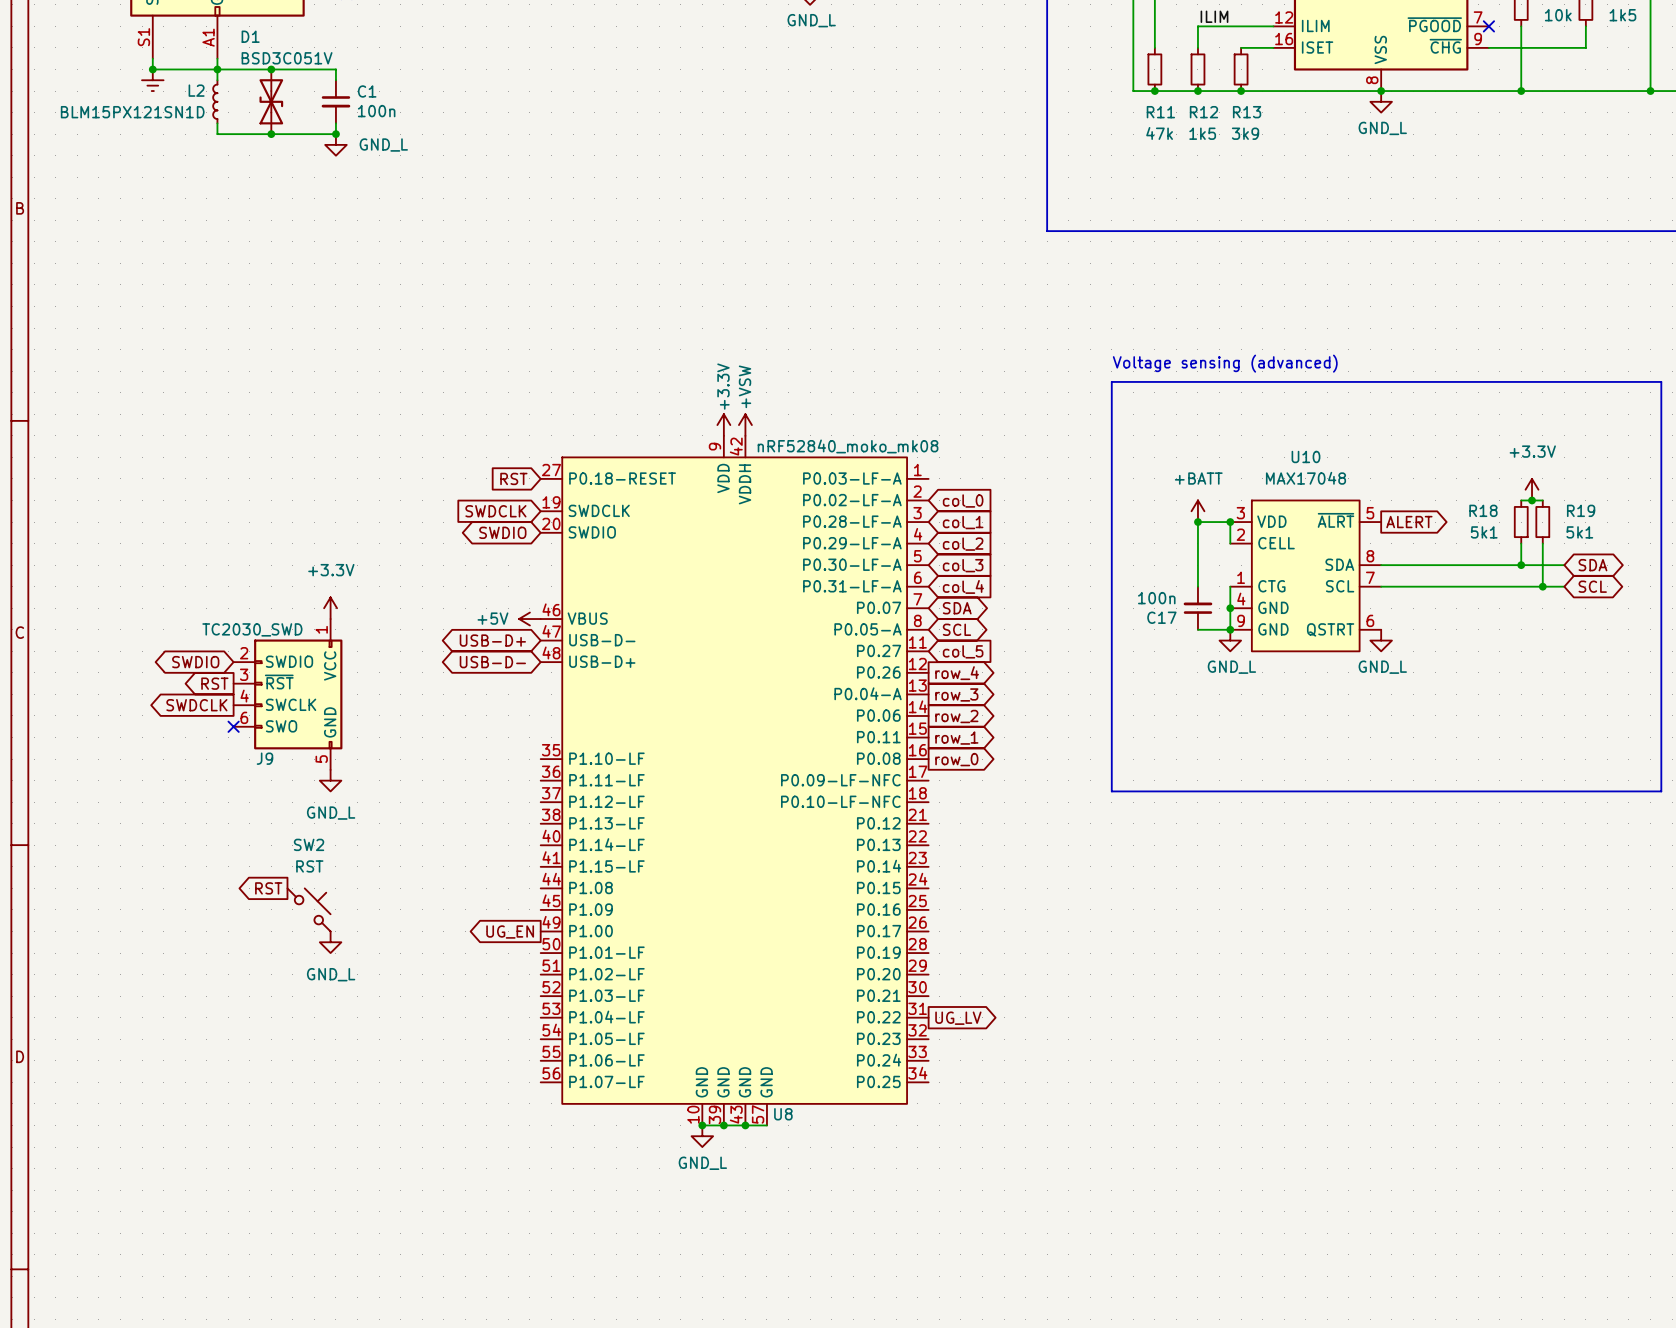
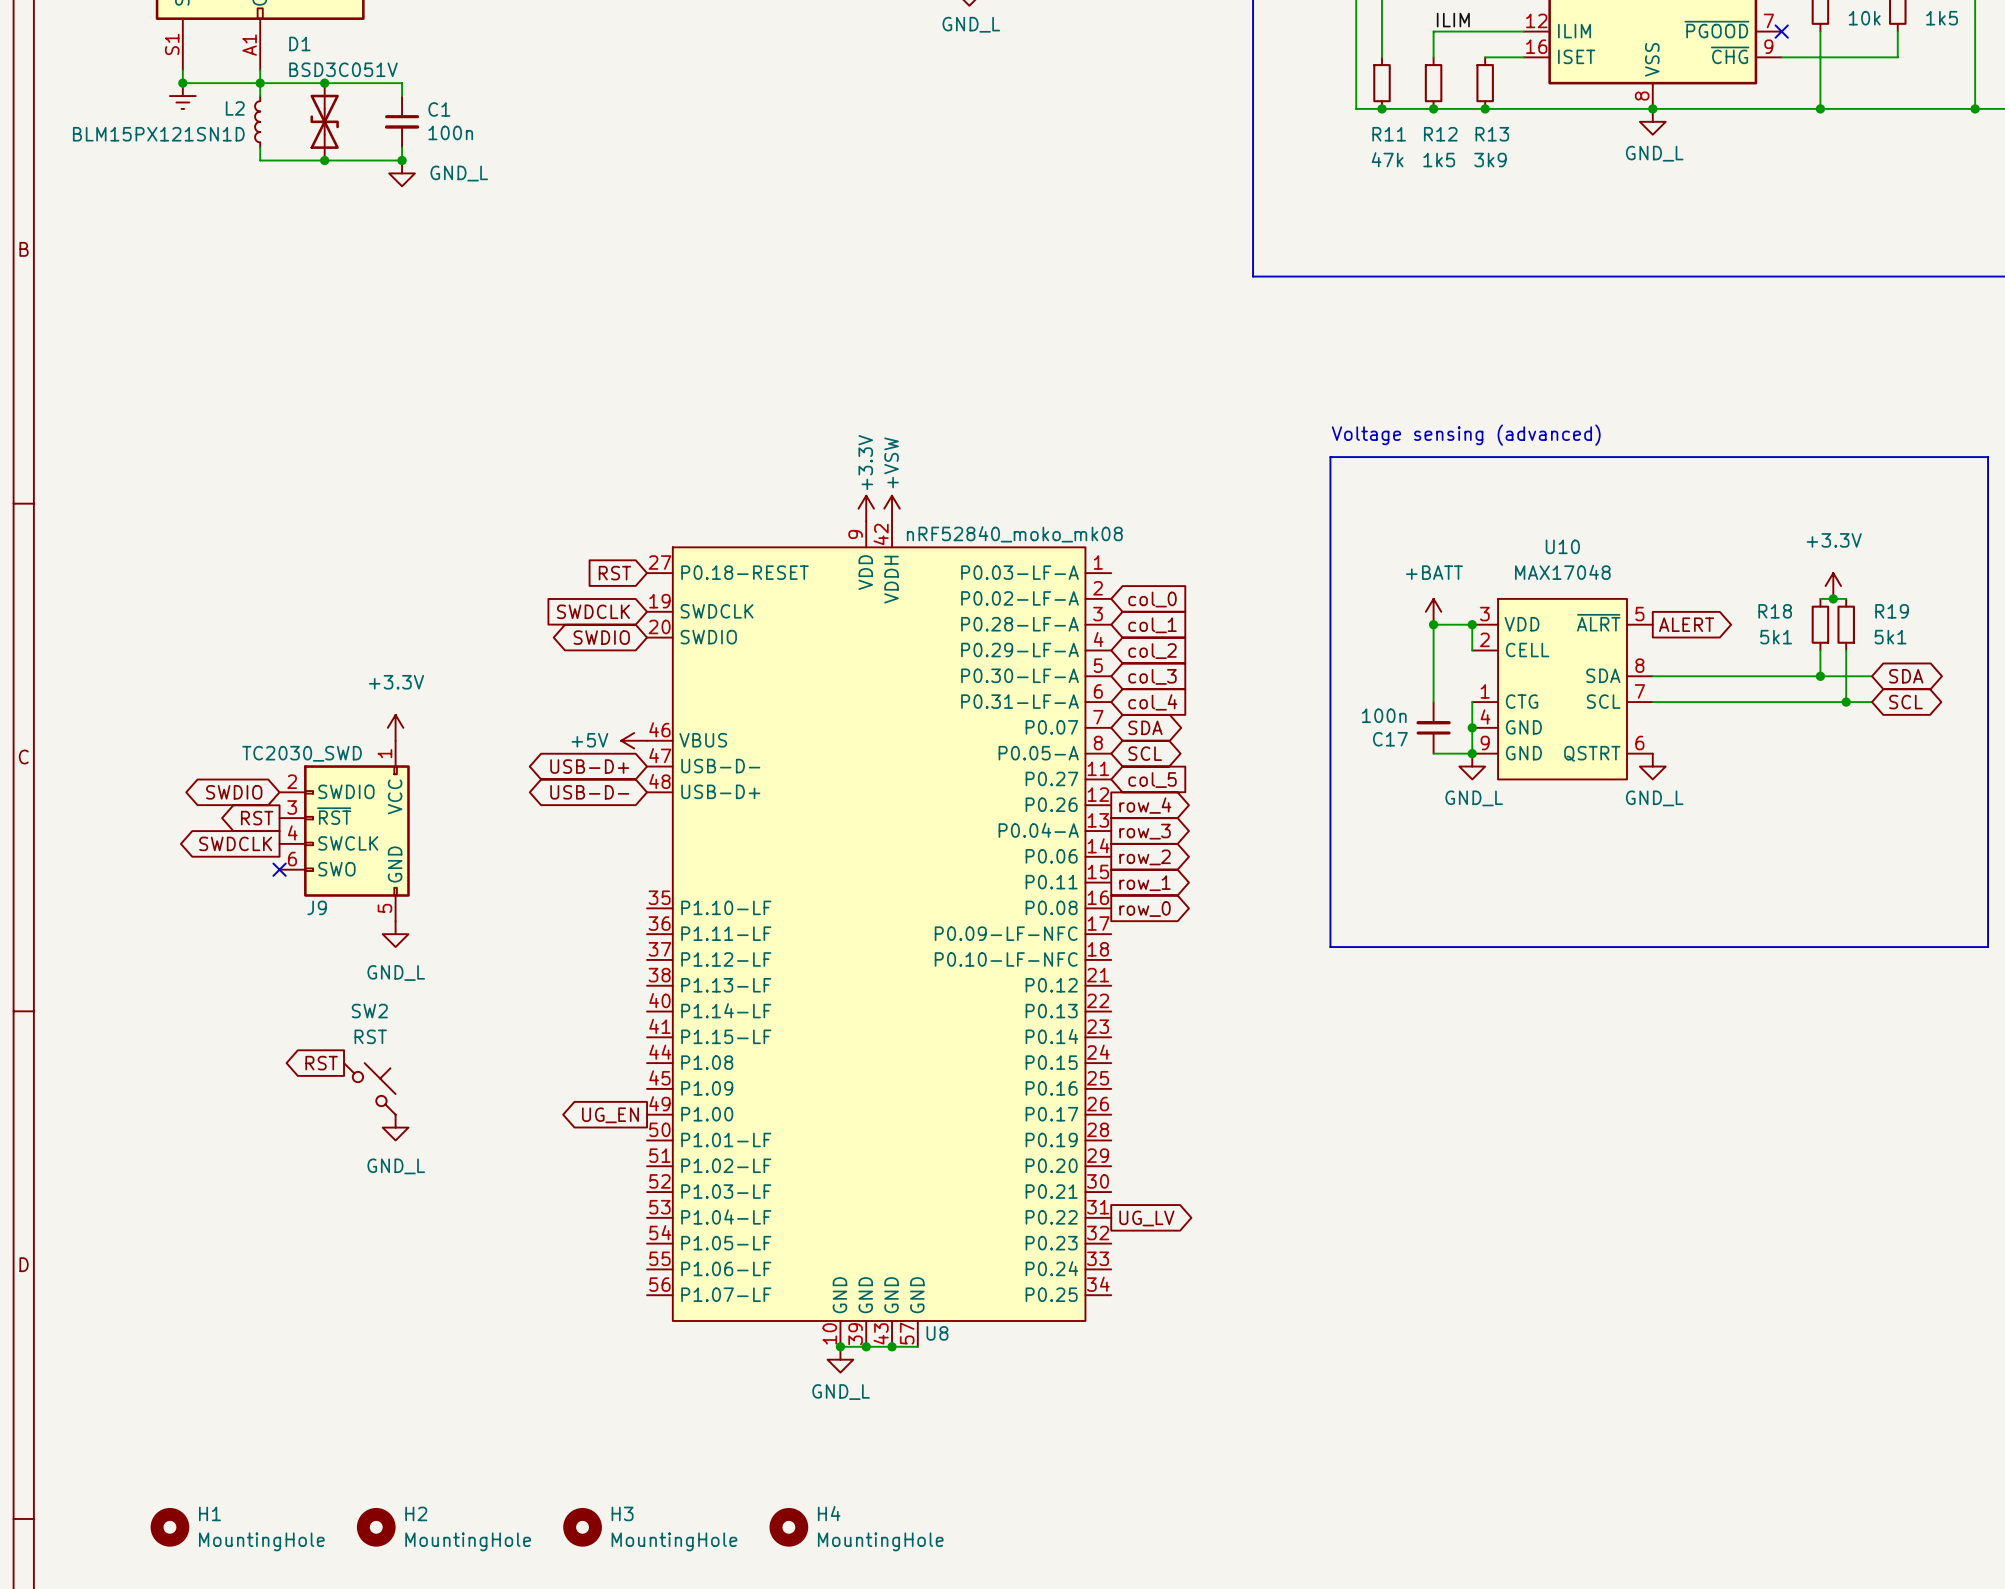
H1: none -> MountingHole (169, 1527)
H2: none -> MountingHole (376, 1527)
H3: none -> MountingHole (582, 1527)
H4: none -> MountingHole (788, 1527)

